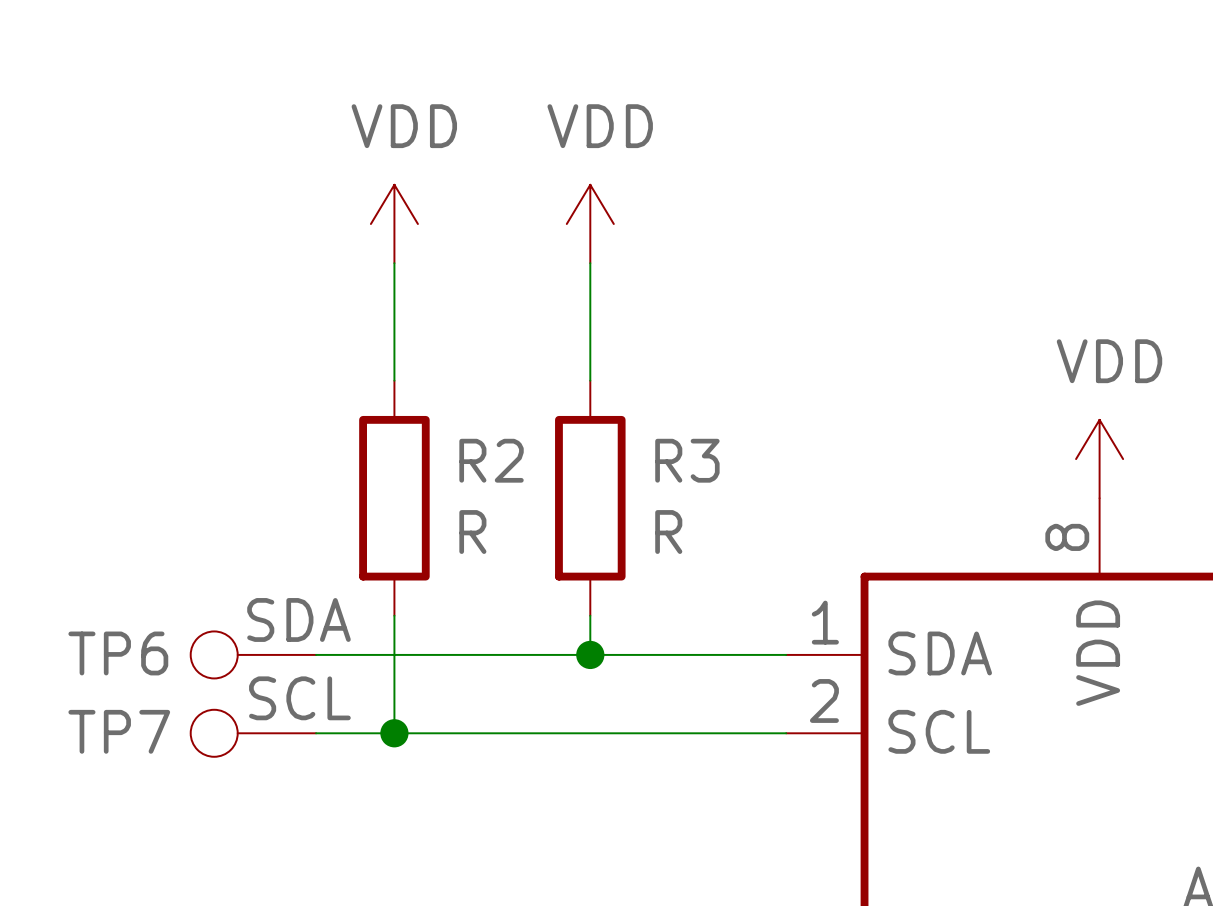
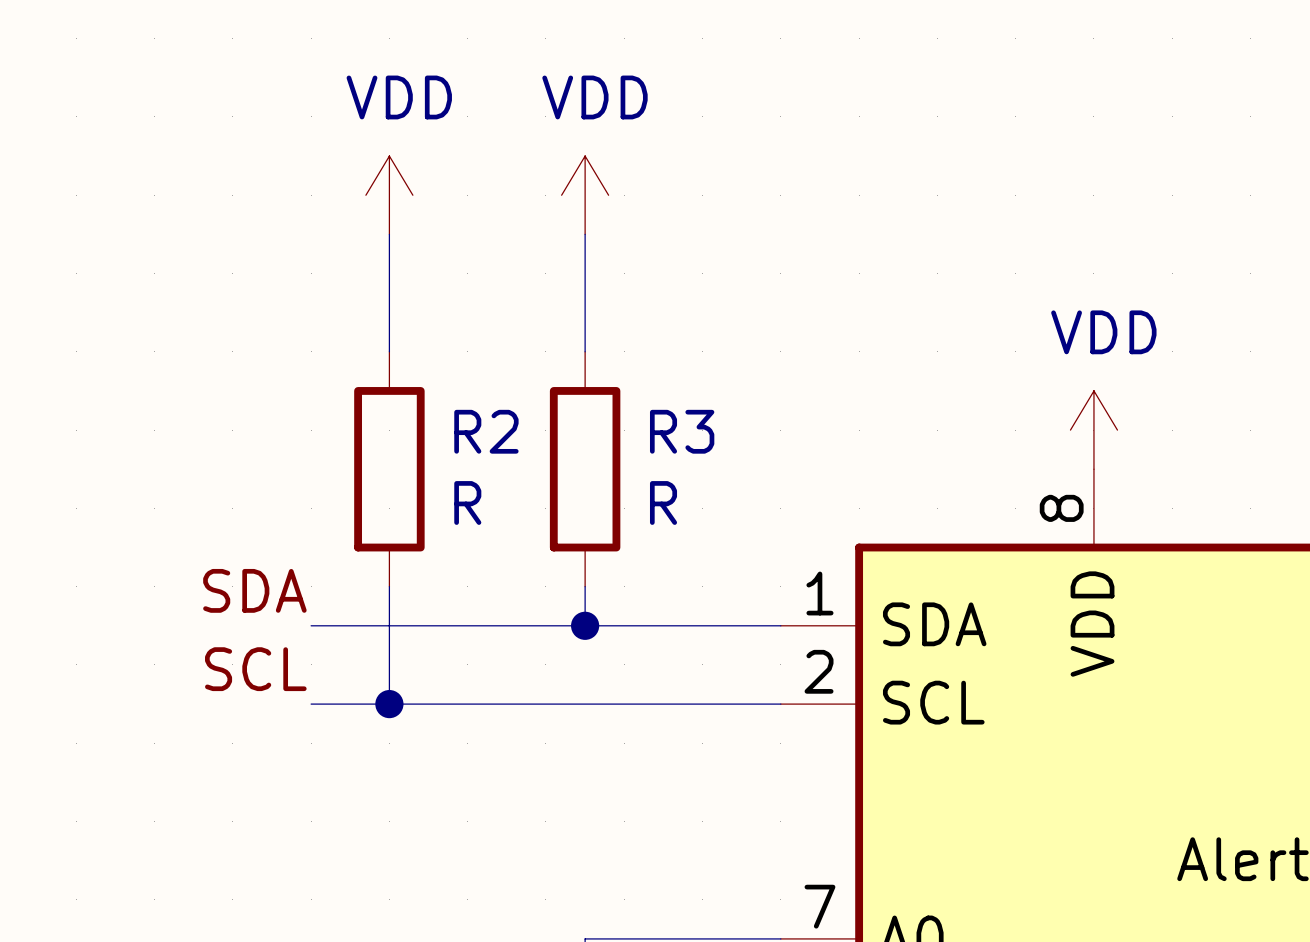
label position: SDA (298, 619) -> SDA (254, 590)
TP6: (253, 654) -> none
label position: SCL (299, 698) -> SCL (255, 669)
TP7: (253, 733) -> none

